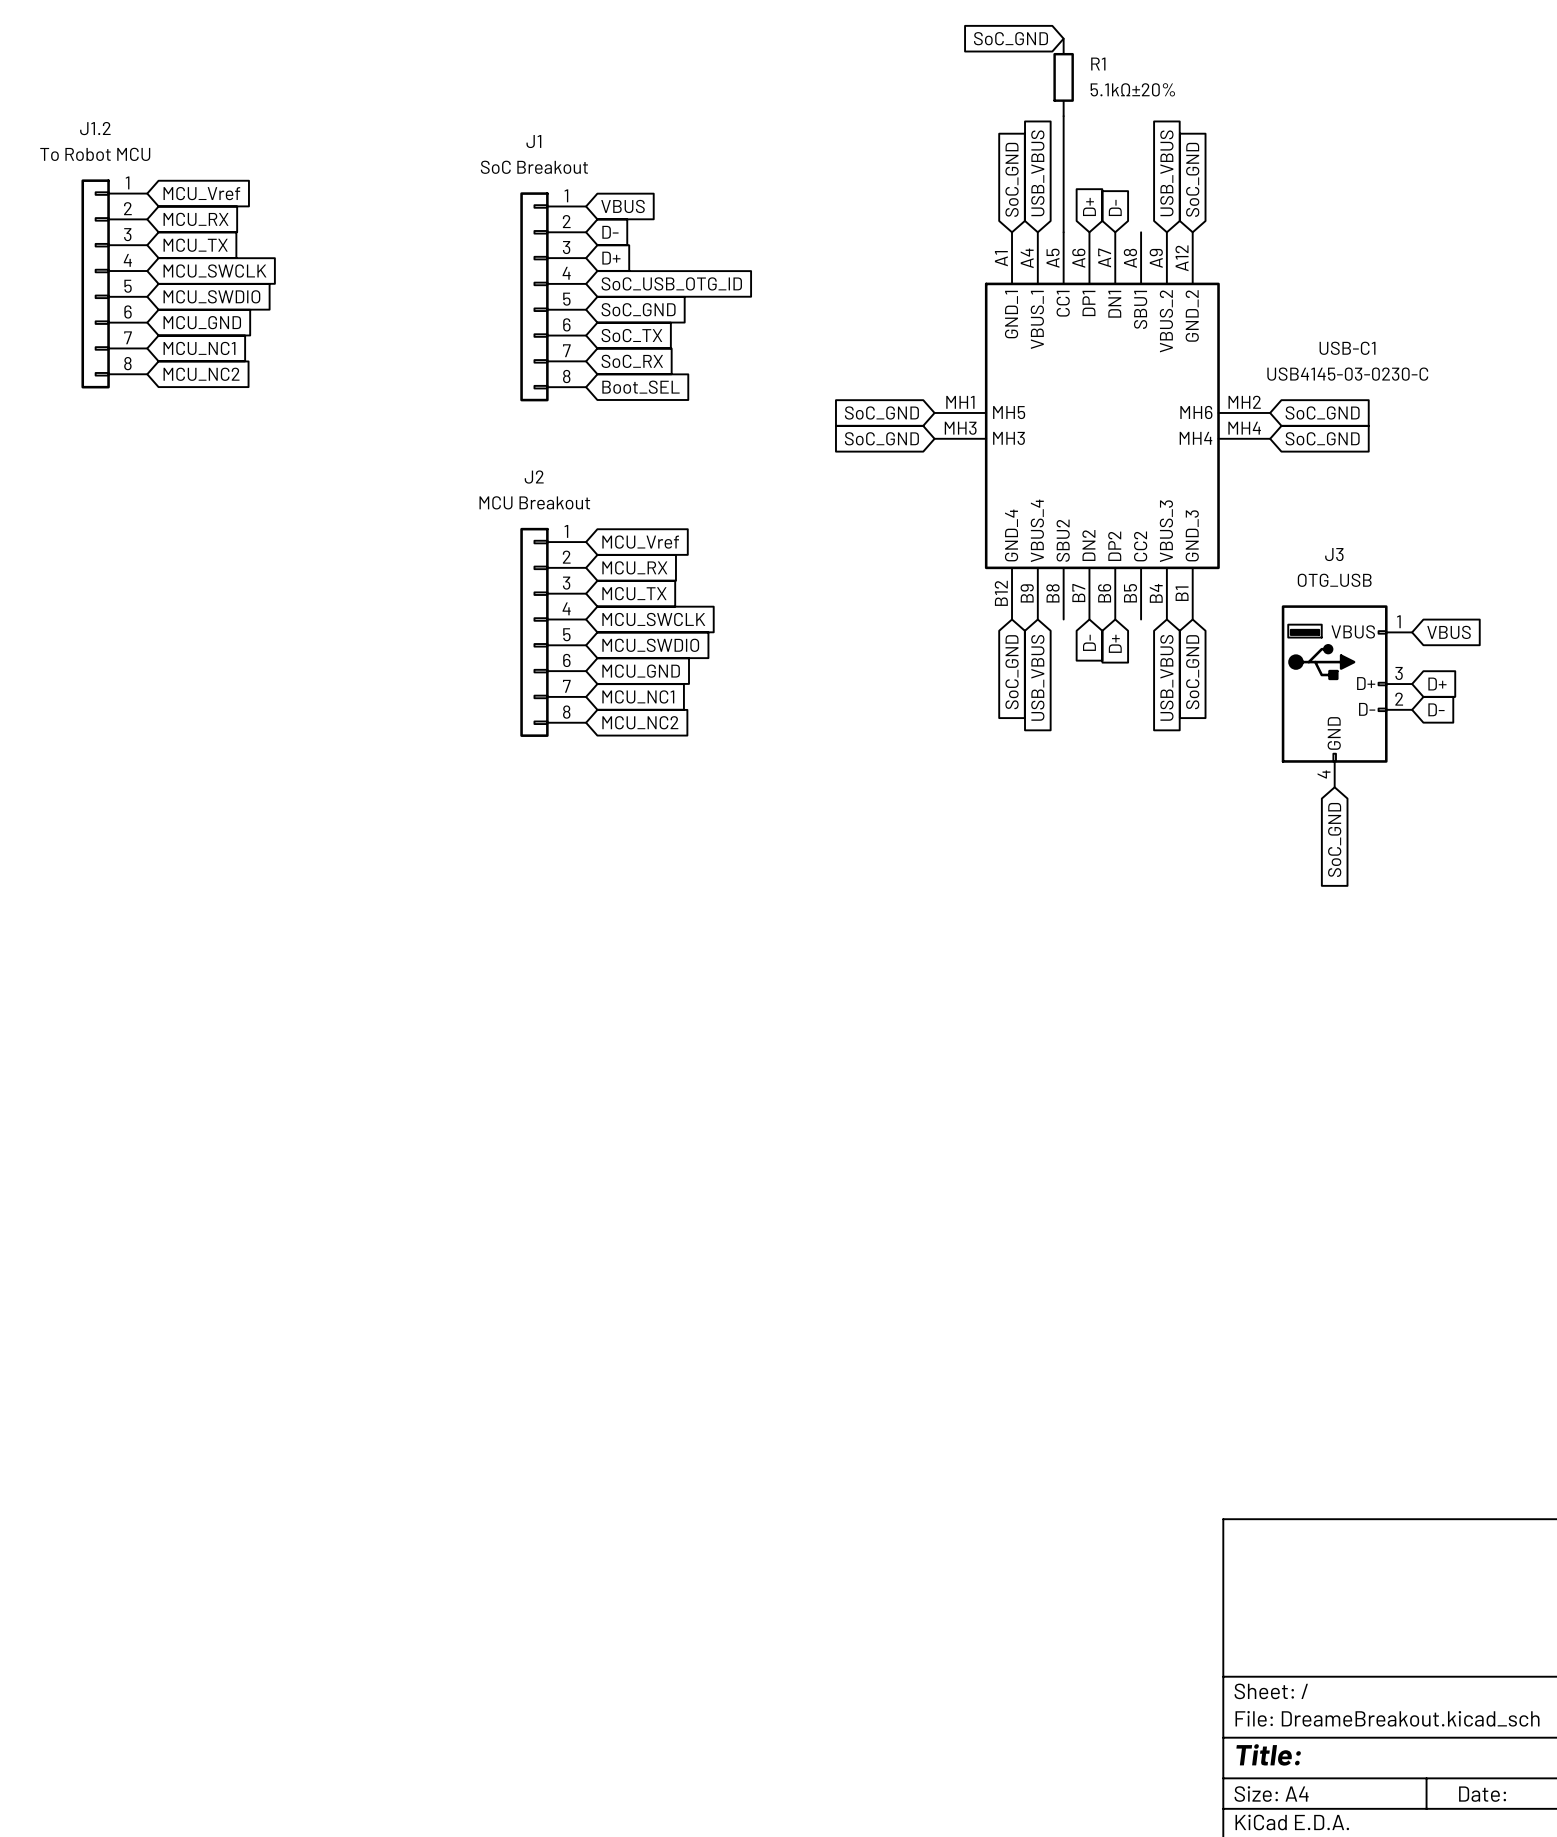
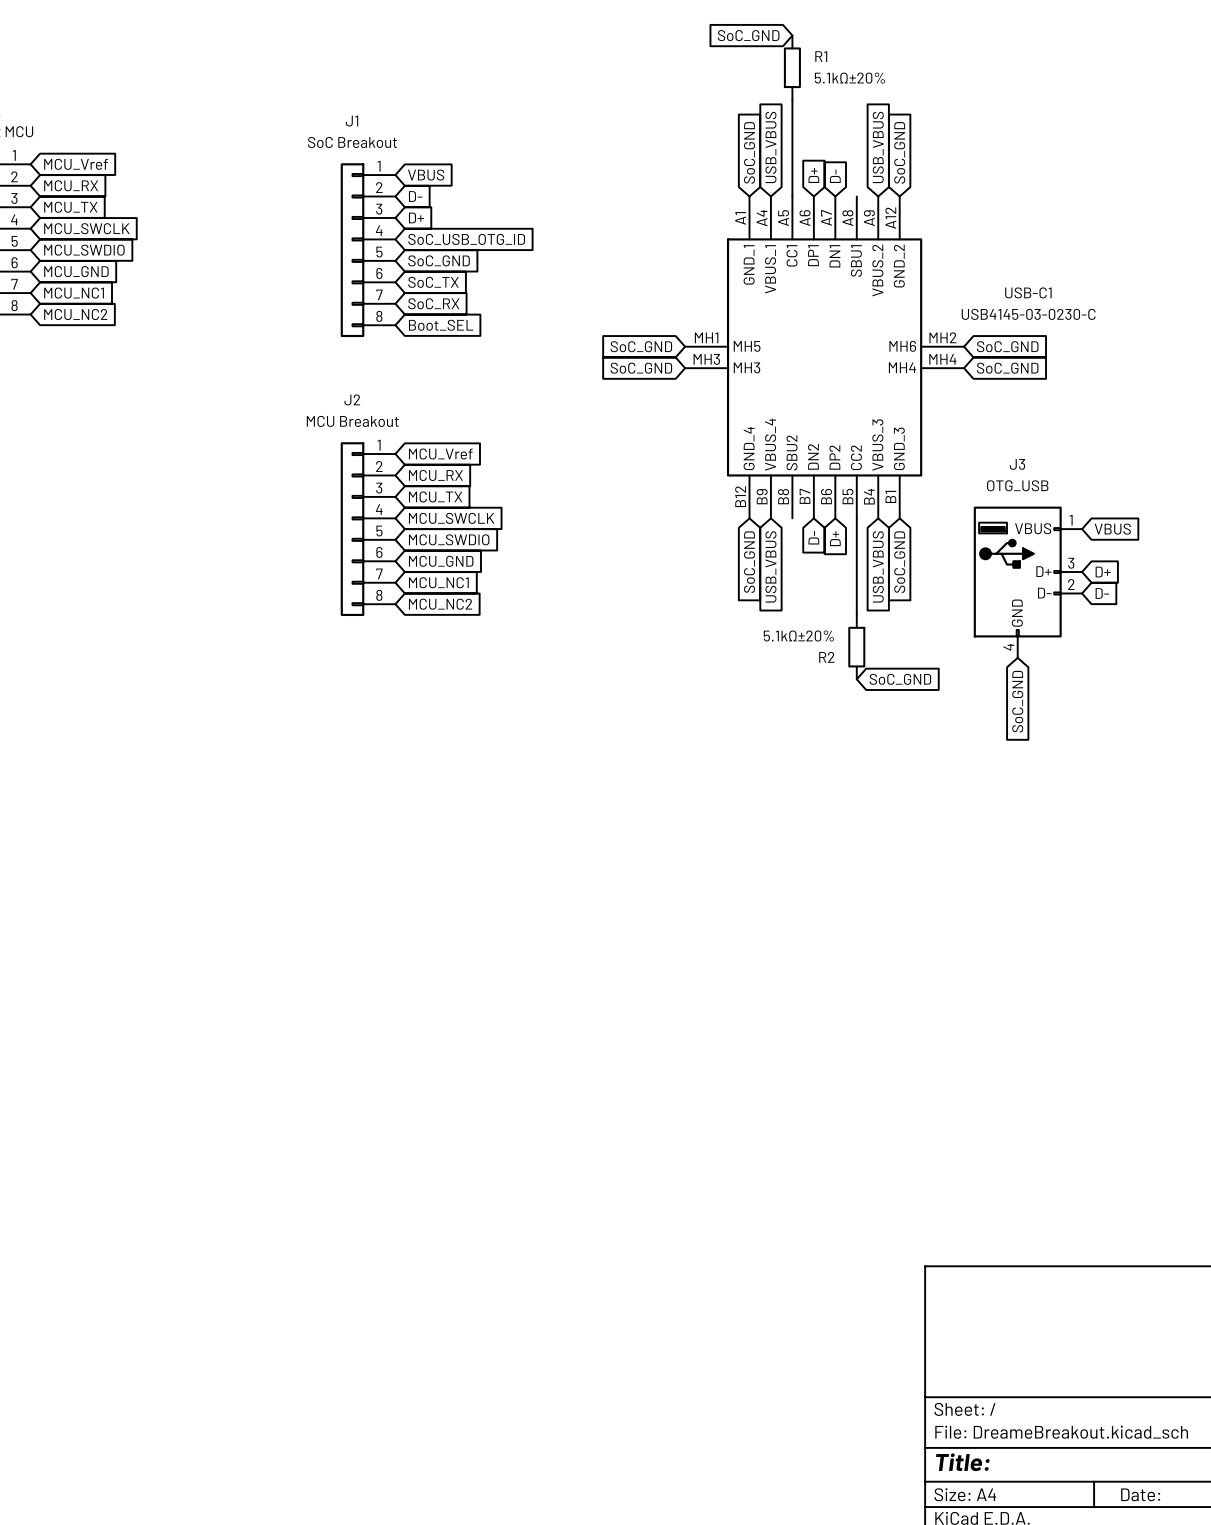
wire: none -> (856, 518) (856, 614)
R2: none -> 5.1kΩ±20% (856, 647)
global label: none -> SoC_GND (900, 679)

